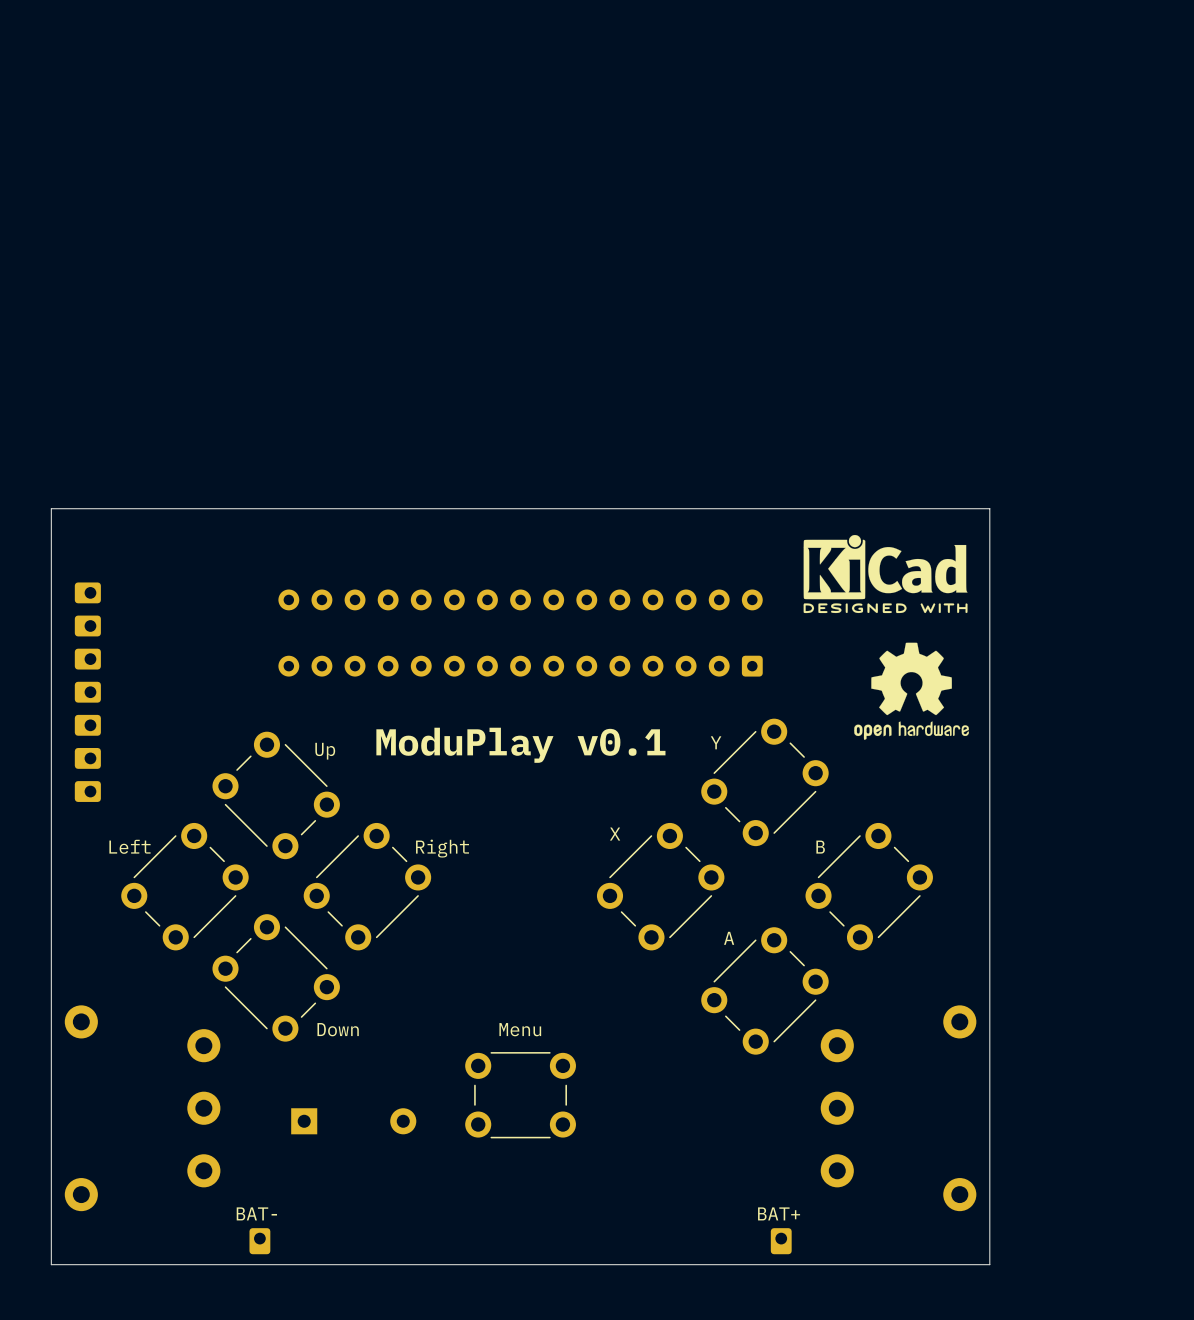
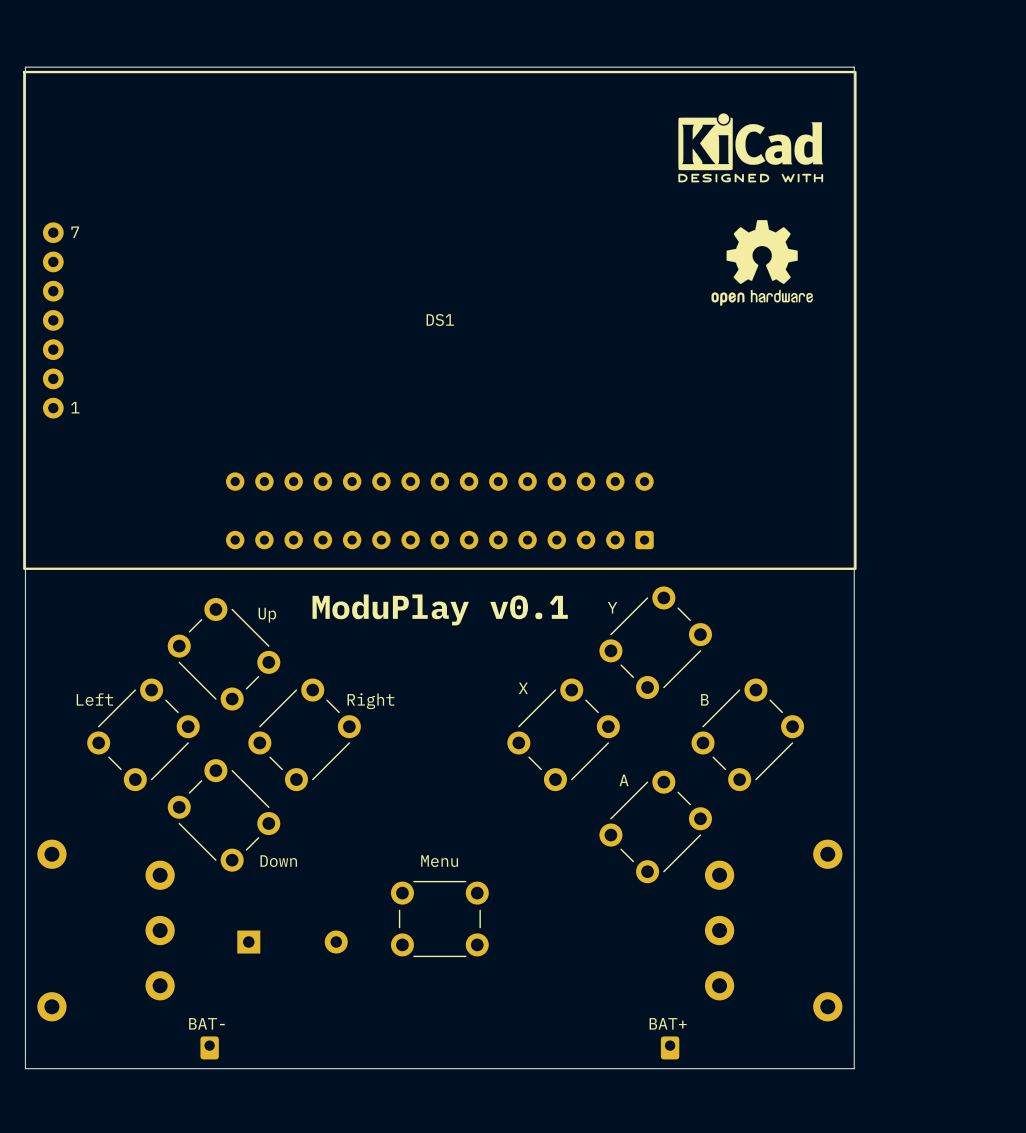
drawing: none -> [678, 113, 824, 183]
drawing: none -> [711, 220, 813, 306]
DS1: none -> (439, 320)
board edge: (51, 508) (989, 508) -> (25, 401) (25, 67) (854, 67) (854, 401)
drawing: [803, 534, 968, 614] -> none
drawing: [854, 642, 969, 740] -> none
part: (87, 692) -> none

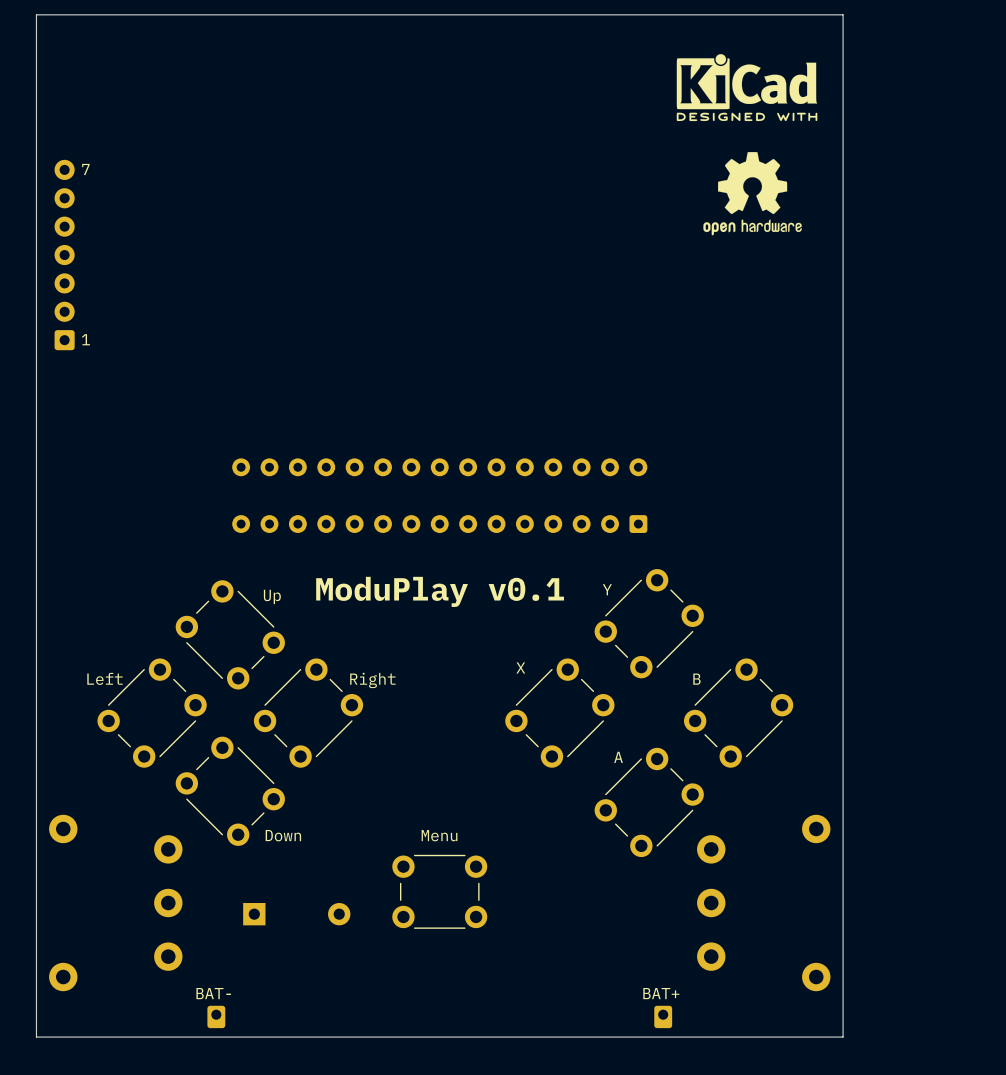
drawing position: (750, 147) -> (747, 87)
part: none -> (64, 255)
drawing position: (762, 262) -> (752, 193)
DS1: (439, 320) -> none
board edge: (25, 1068) (25, 67) (854, 67) (854, 1068) -> (37, 1037) (36, 14) (843, 14) (841, 1037)

